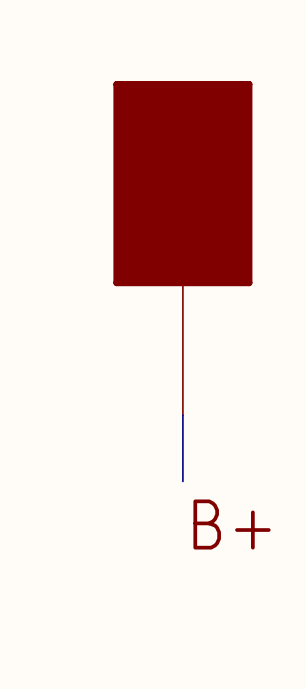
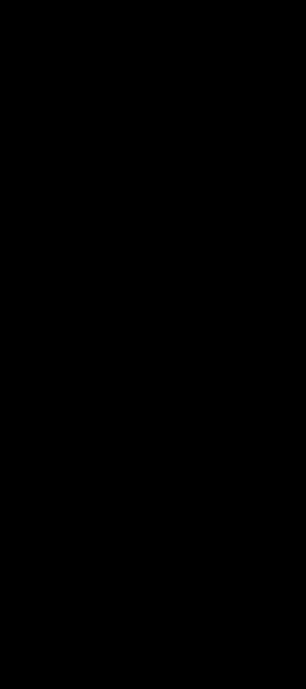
part: (182, 248) -> none
wire: (182, 415) (182, 481) -> none
label: B+ (232, 524) -> none

